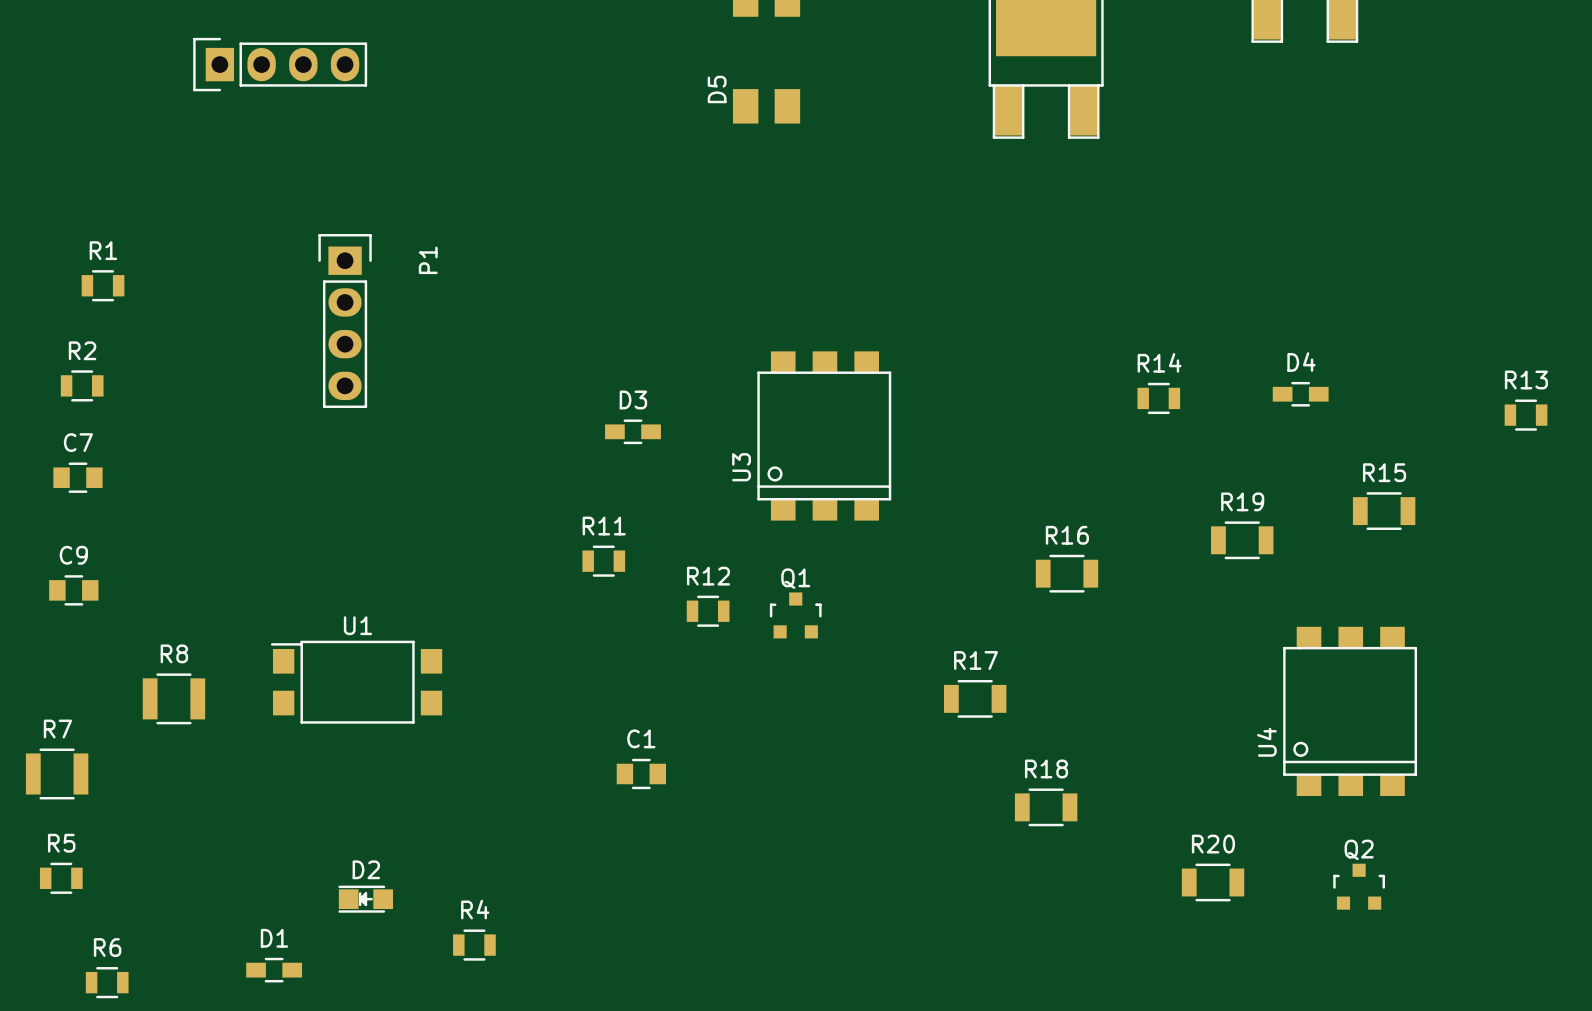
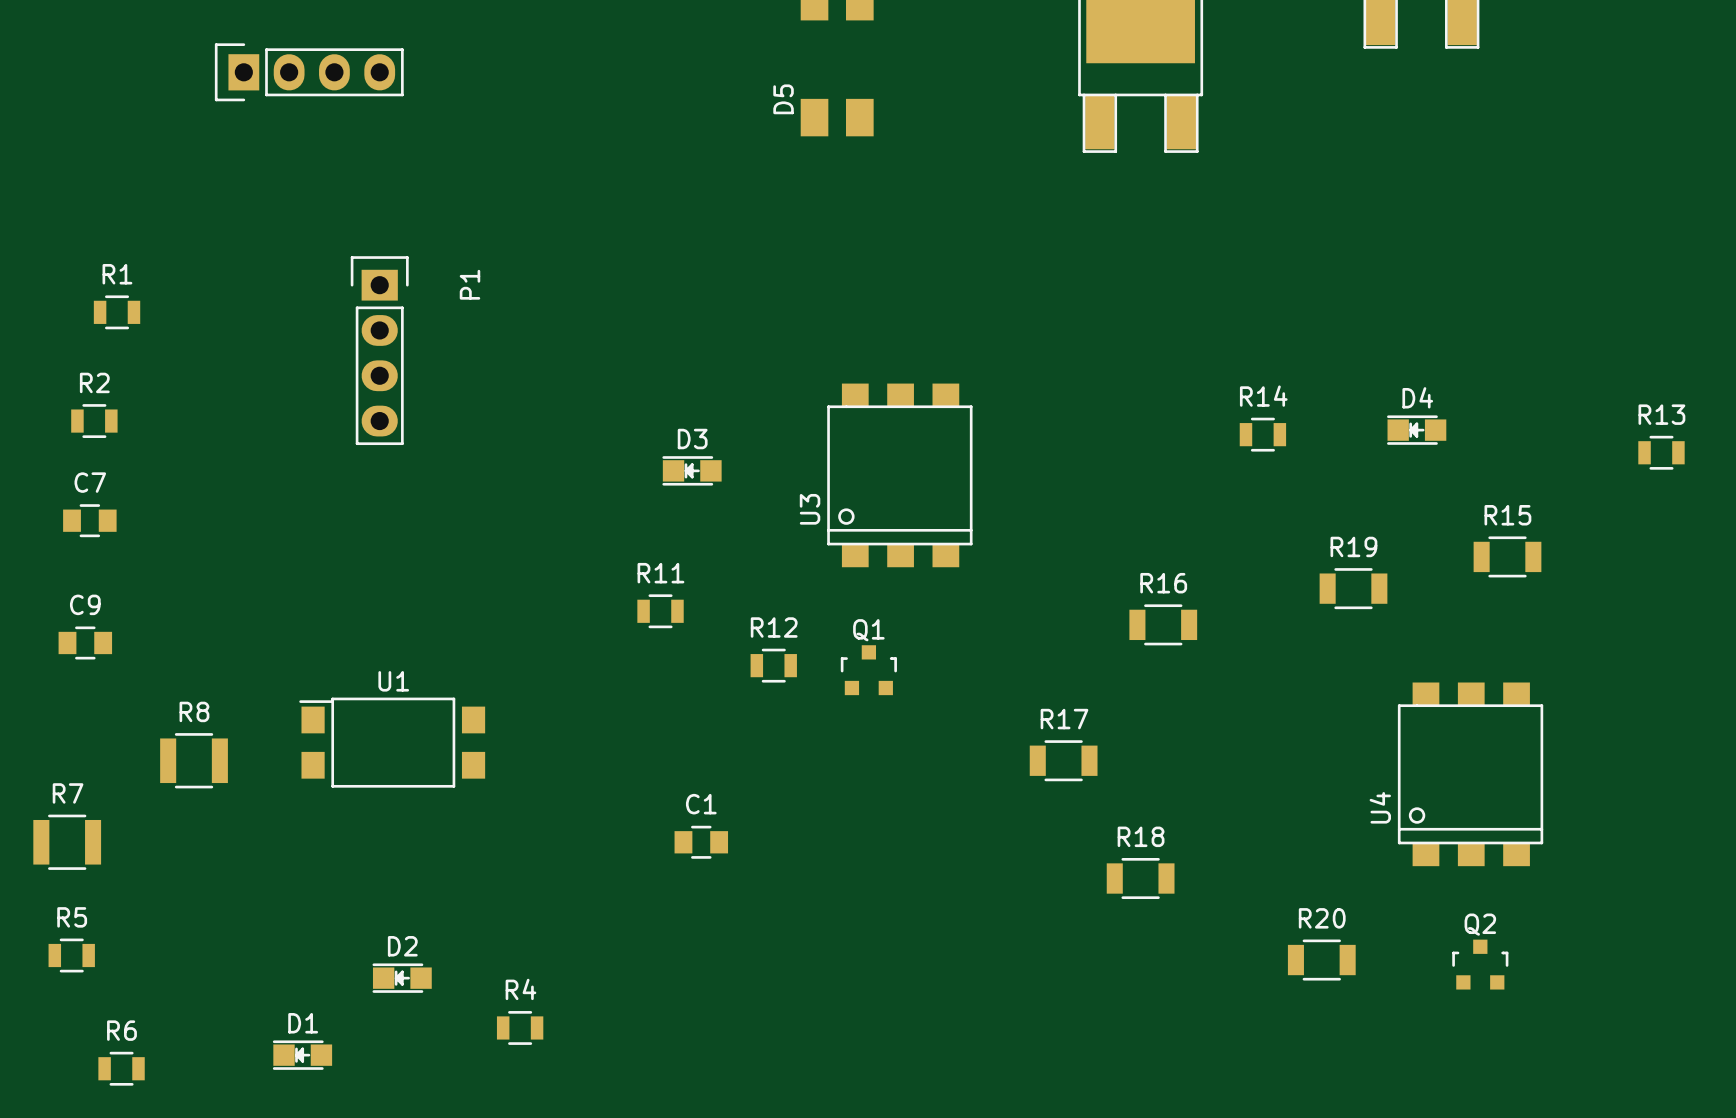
D4 footprint: [1272, 381, 1329, 407] -> [1387, 415, 1447, 445]
D3 footprint: [605, 419, 661, 445] -> [662, 456, 722, 486]
D1 footprint: [246, 957, 303, 983] -> [272, 1040, 333, 1070]

